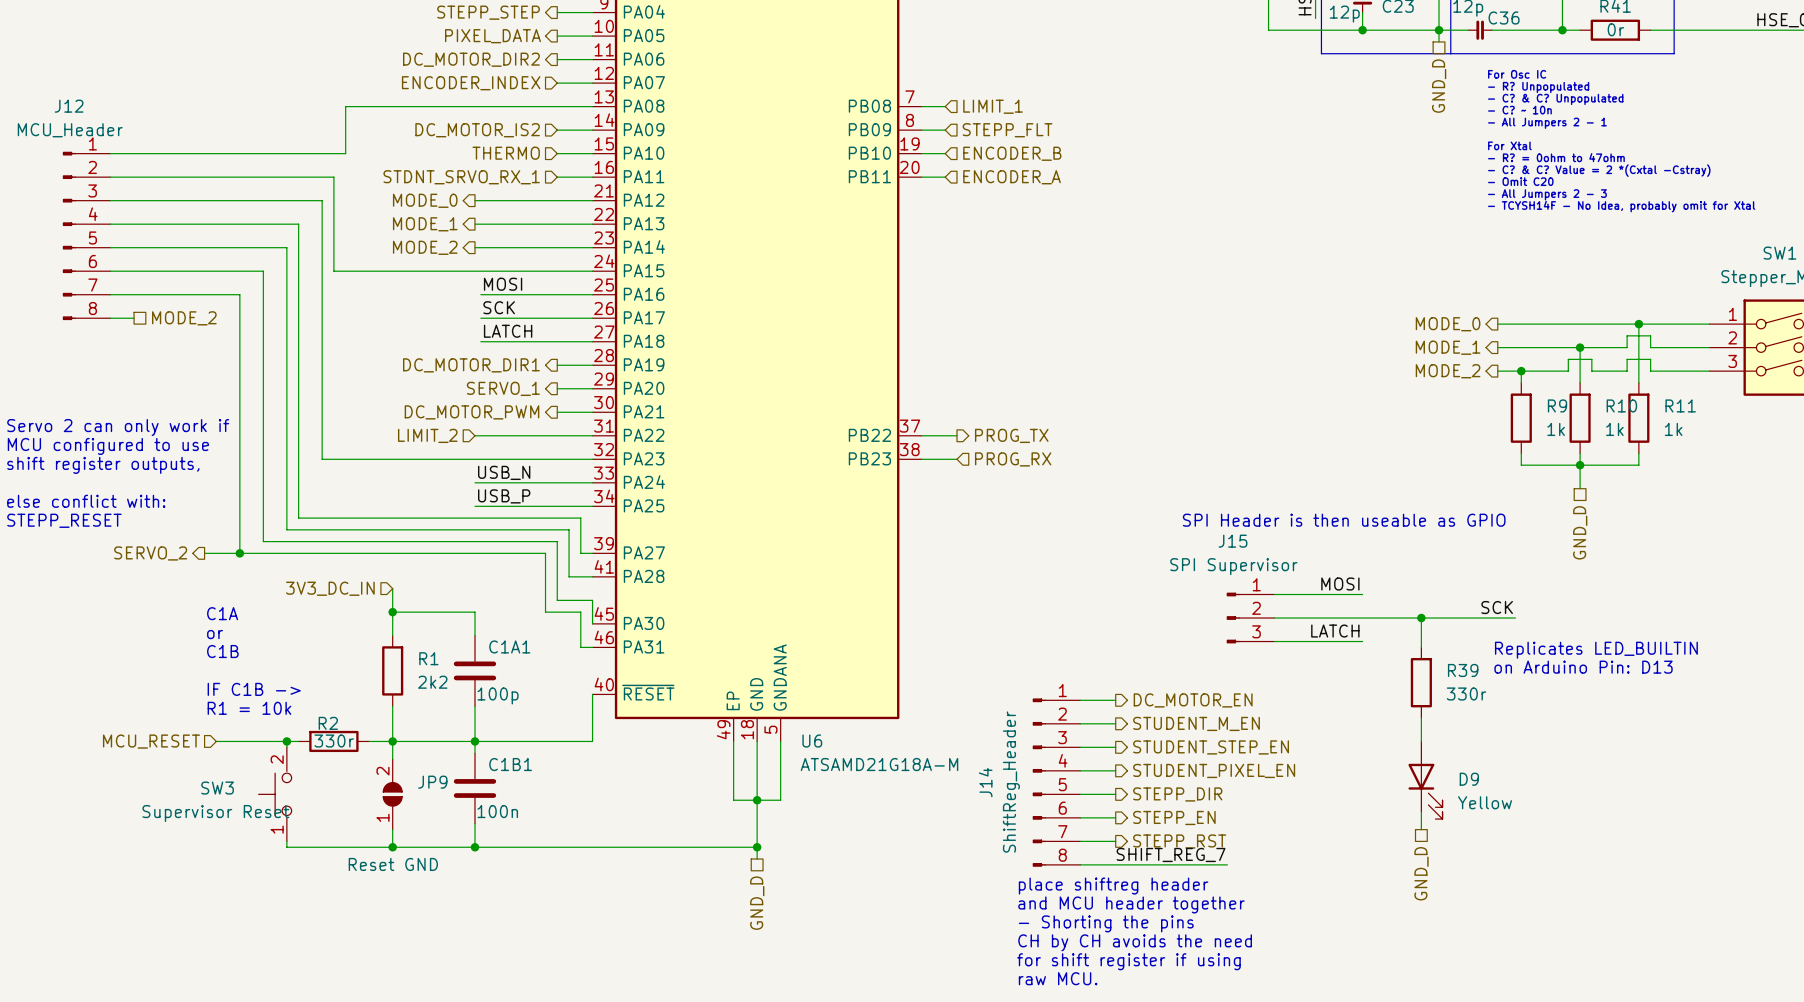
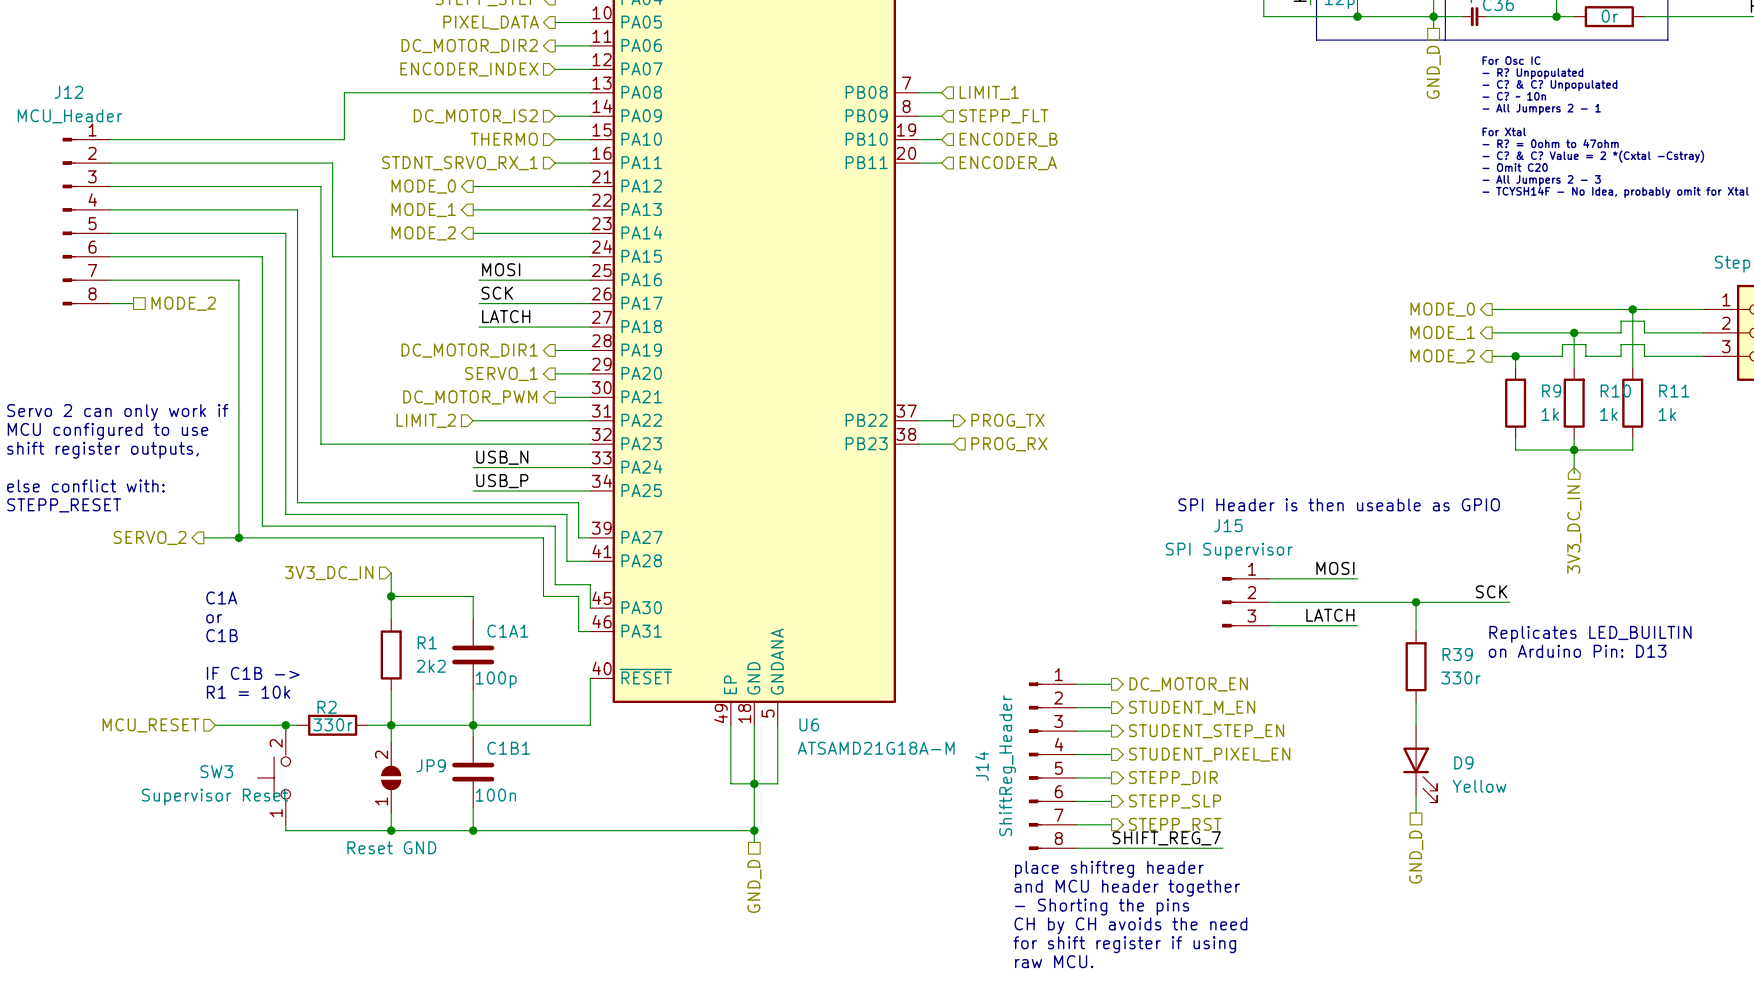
hierarchical label shape: passive (1580, 532) -> input (1574, 529)
hierarchical label: GND_D (1580, 532) -> 3V3_DC_IN (1574, 529)
hierarchical label: STEPP_EN (1174, 817) -> STEPP_SLP (1175, 801)

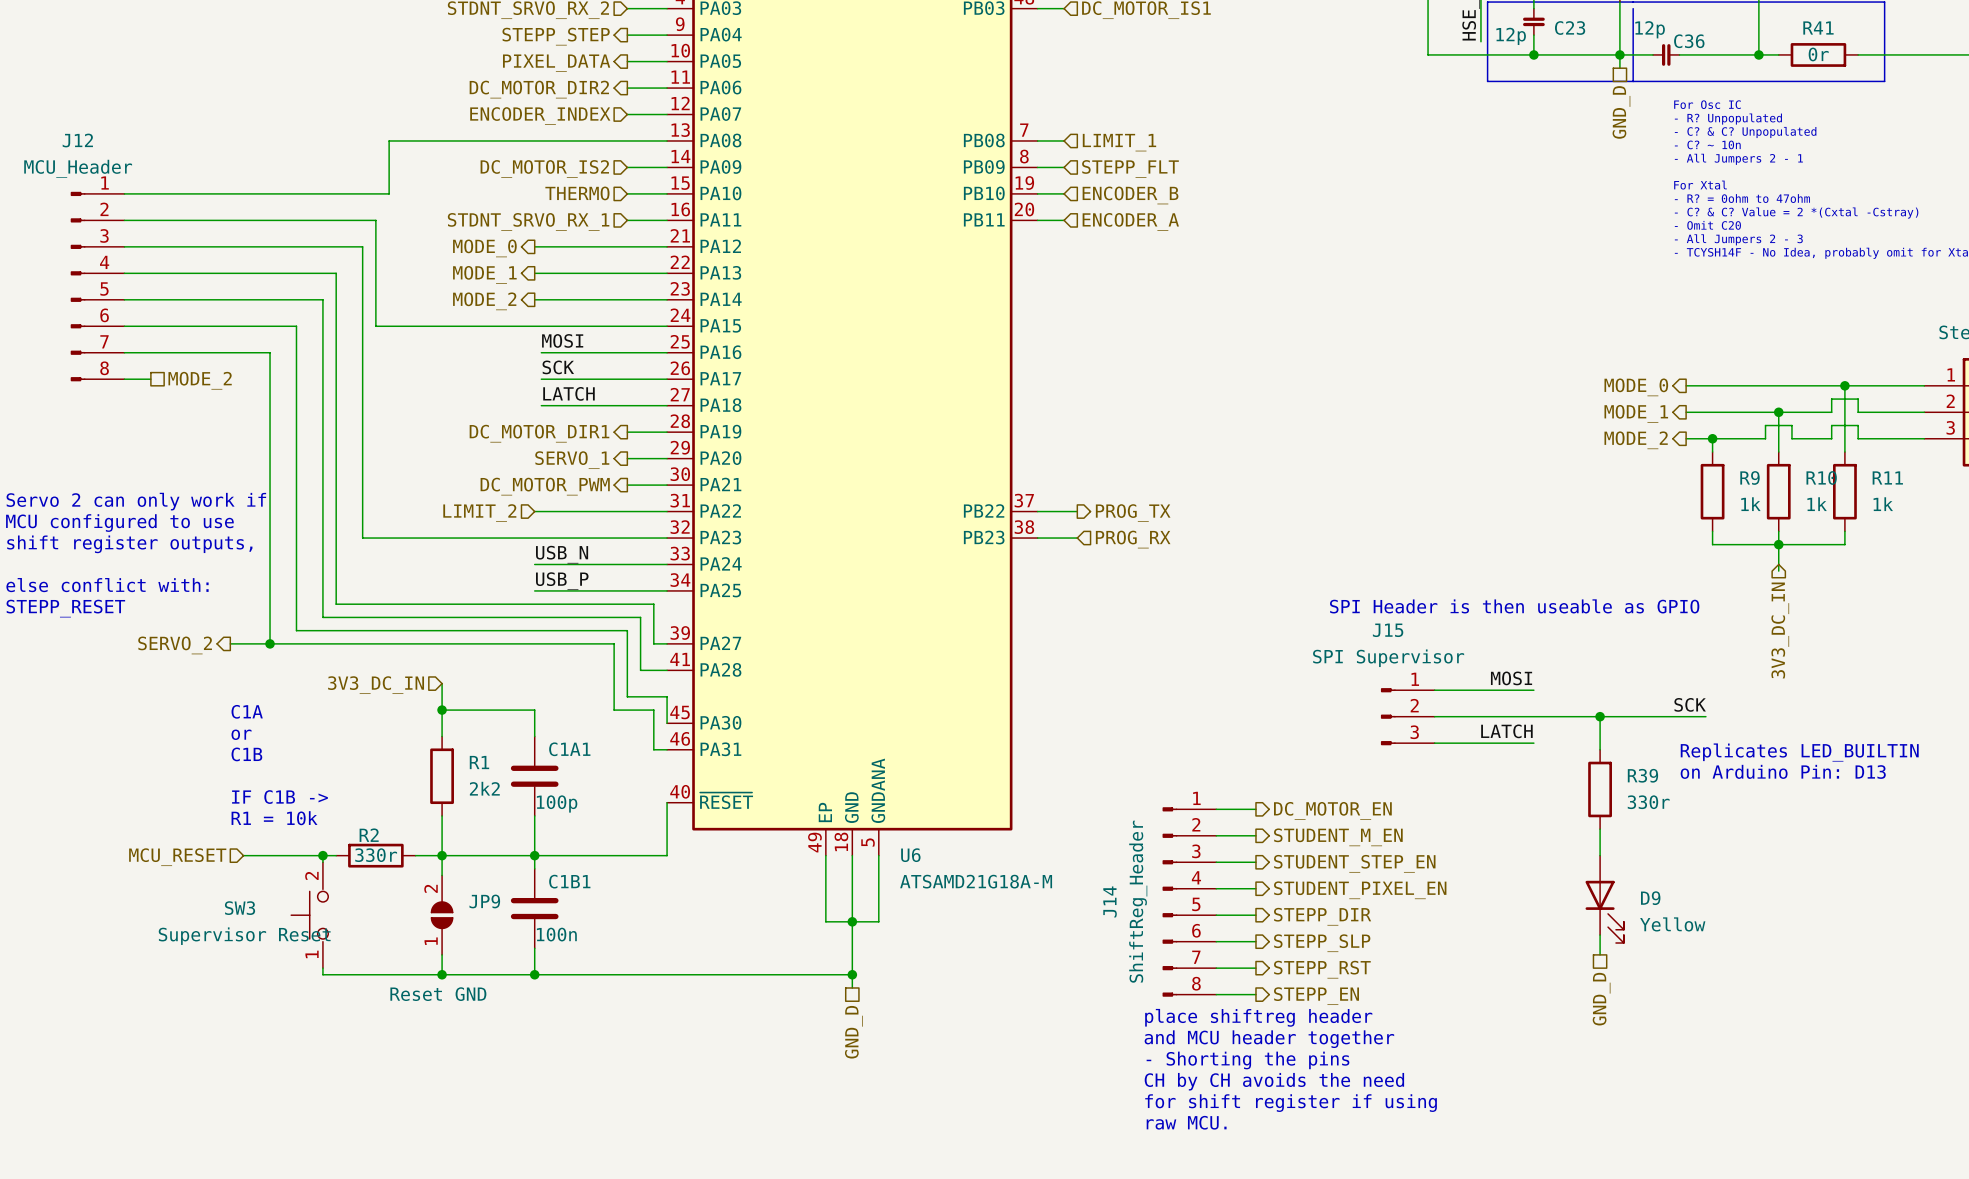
label: SHIFT_REG_7 (1166, 838) -> none
wire: (1111, 848) (1222, 848) -> none
hierarchical label: none -> STEPP_EN (1316, 996)

